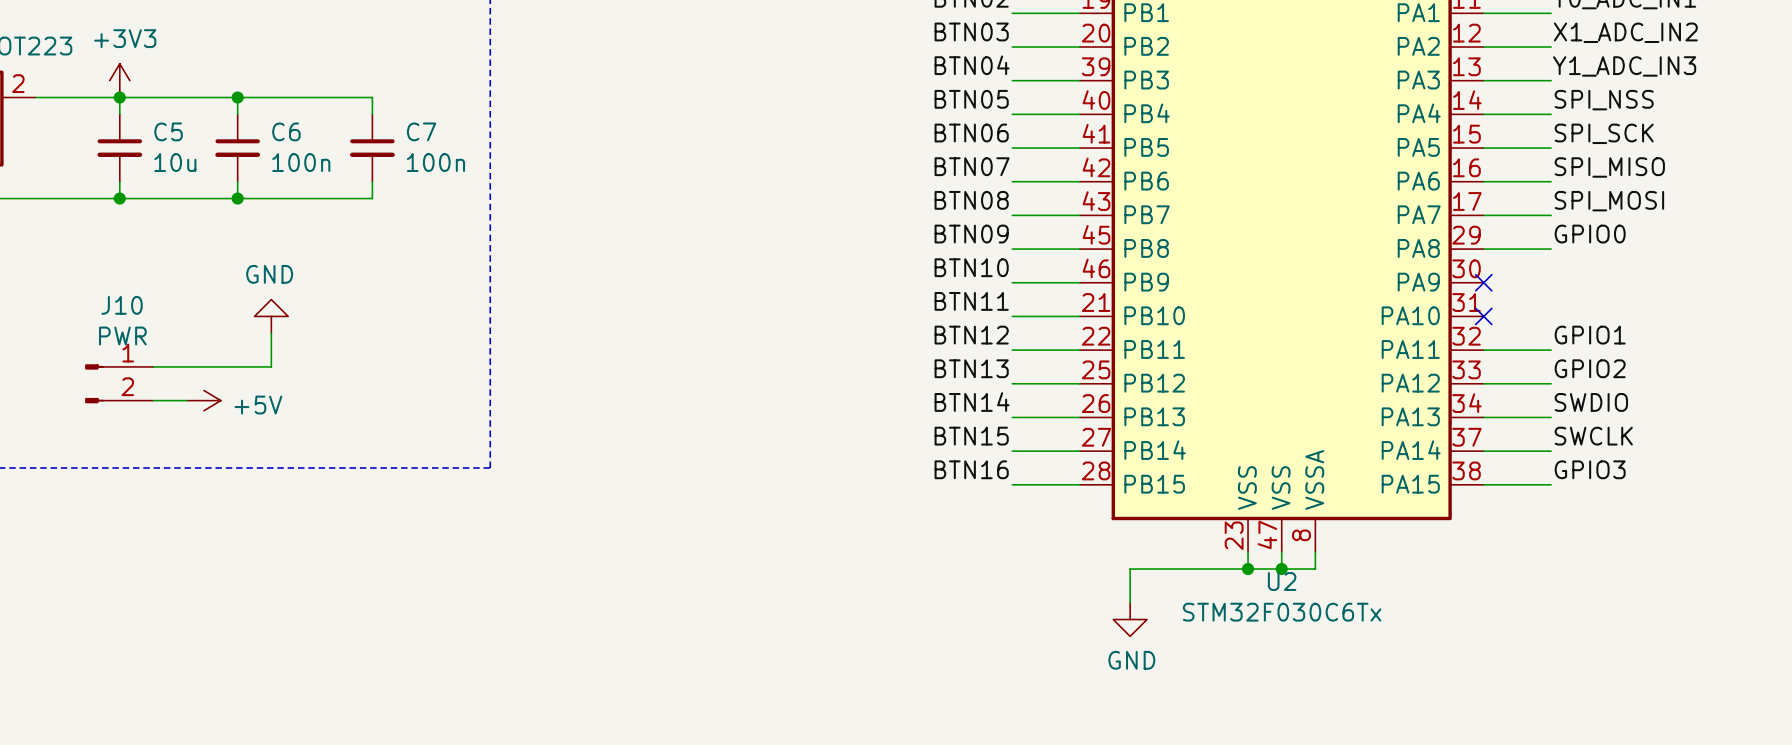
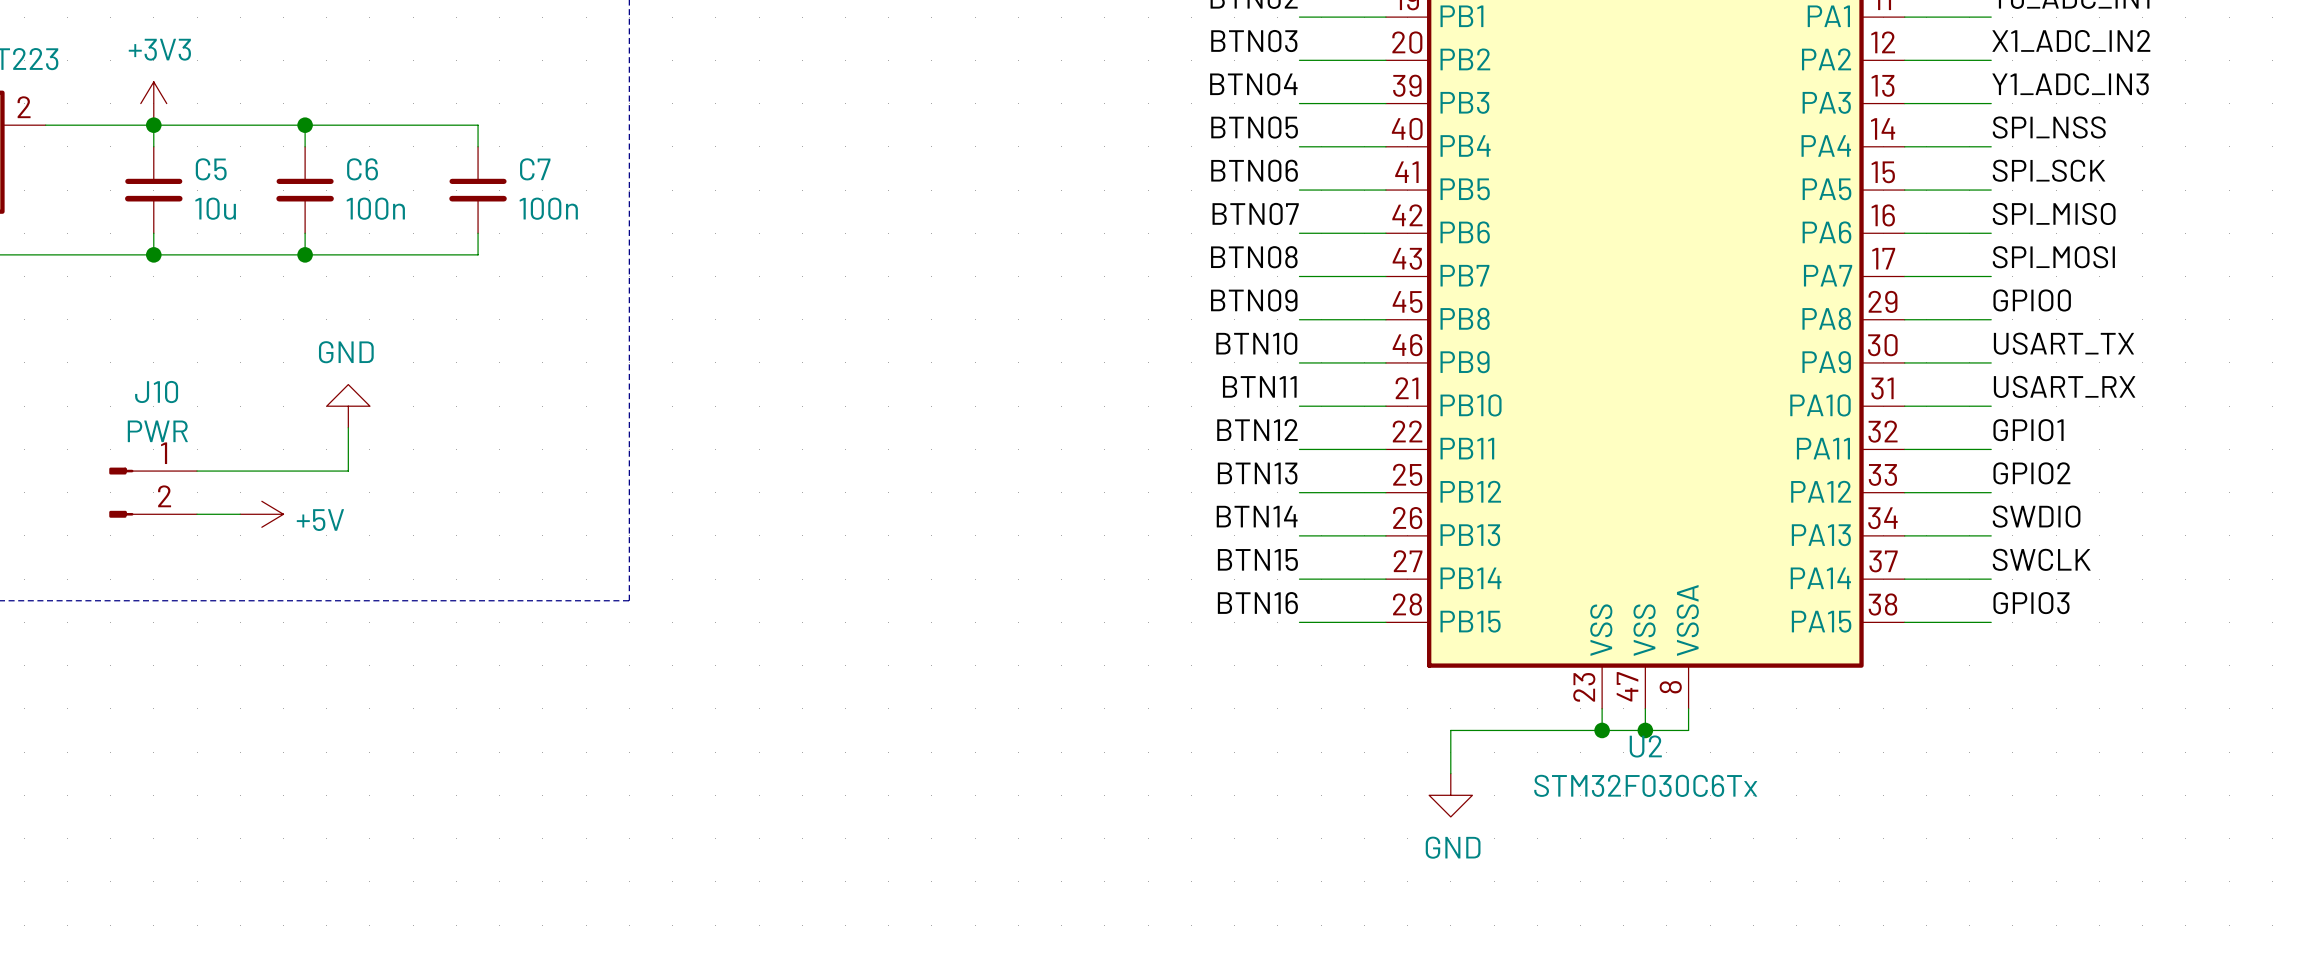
label: none -> USART_TX (2063, 343)
wire: none -> (1904, 362) (1991, 362)
no-connect mark: (1483, 282) -> none
label: none -> USART_RX (2064, 386)
wire: none -> (1904, 406) (1991, 406)
no-connect mark: (1483, 316) -> none

